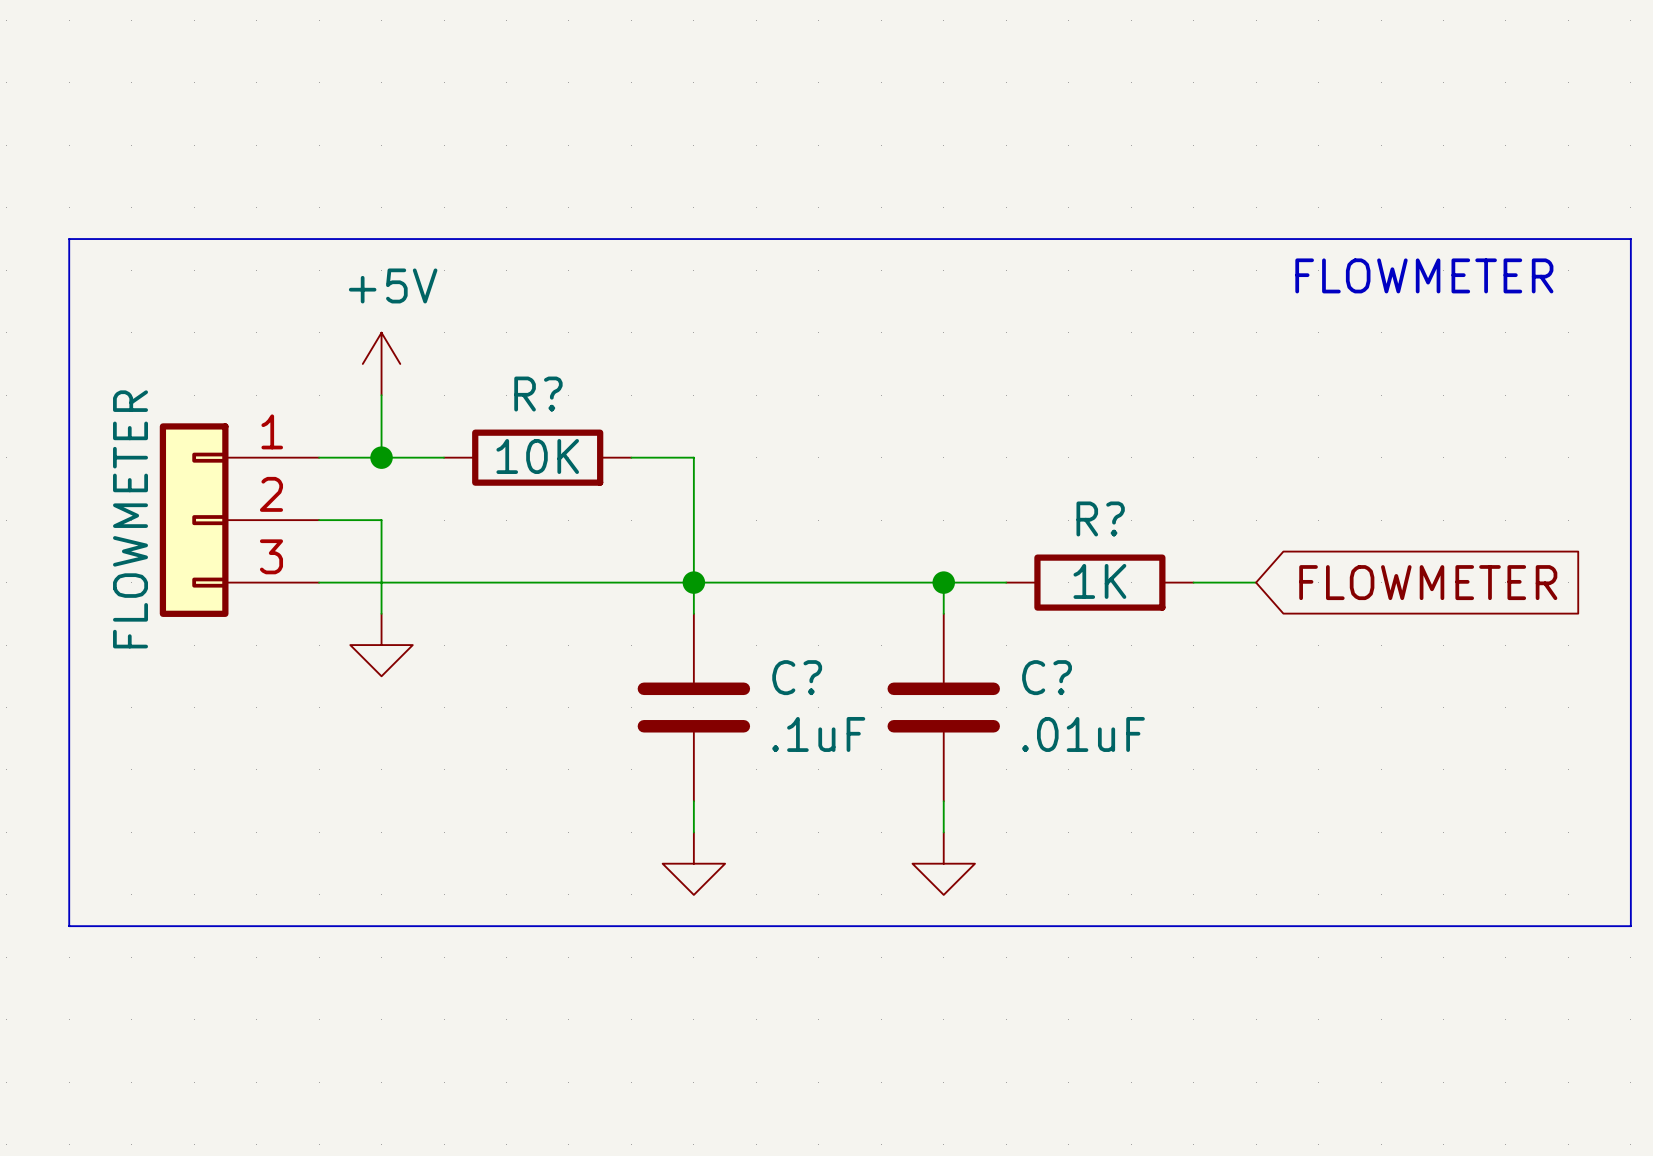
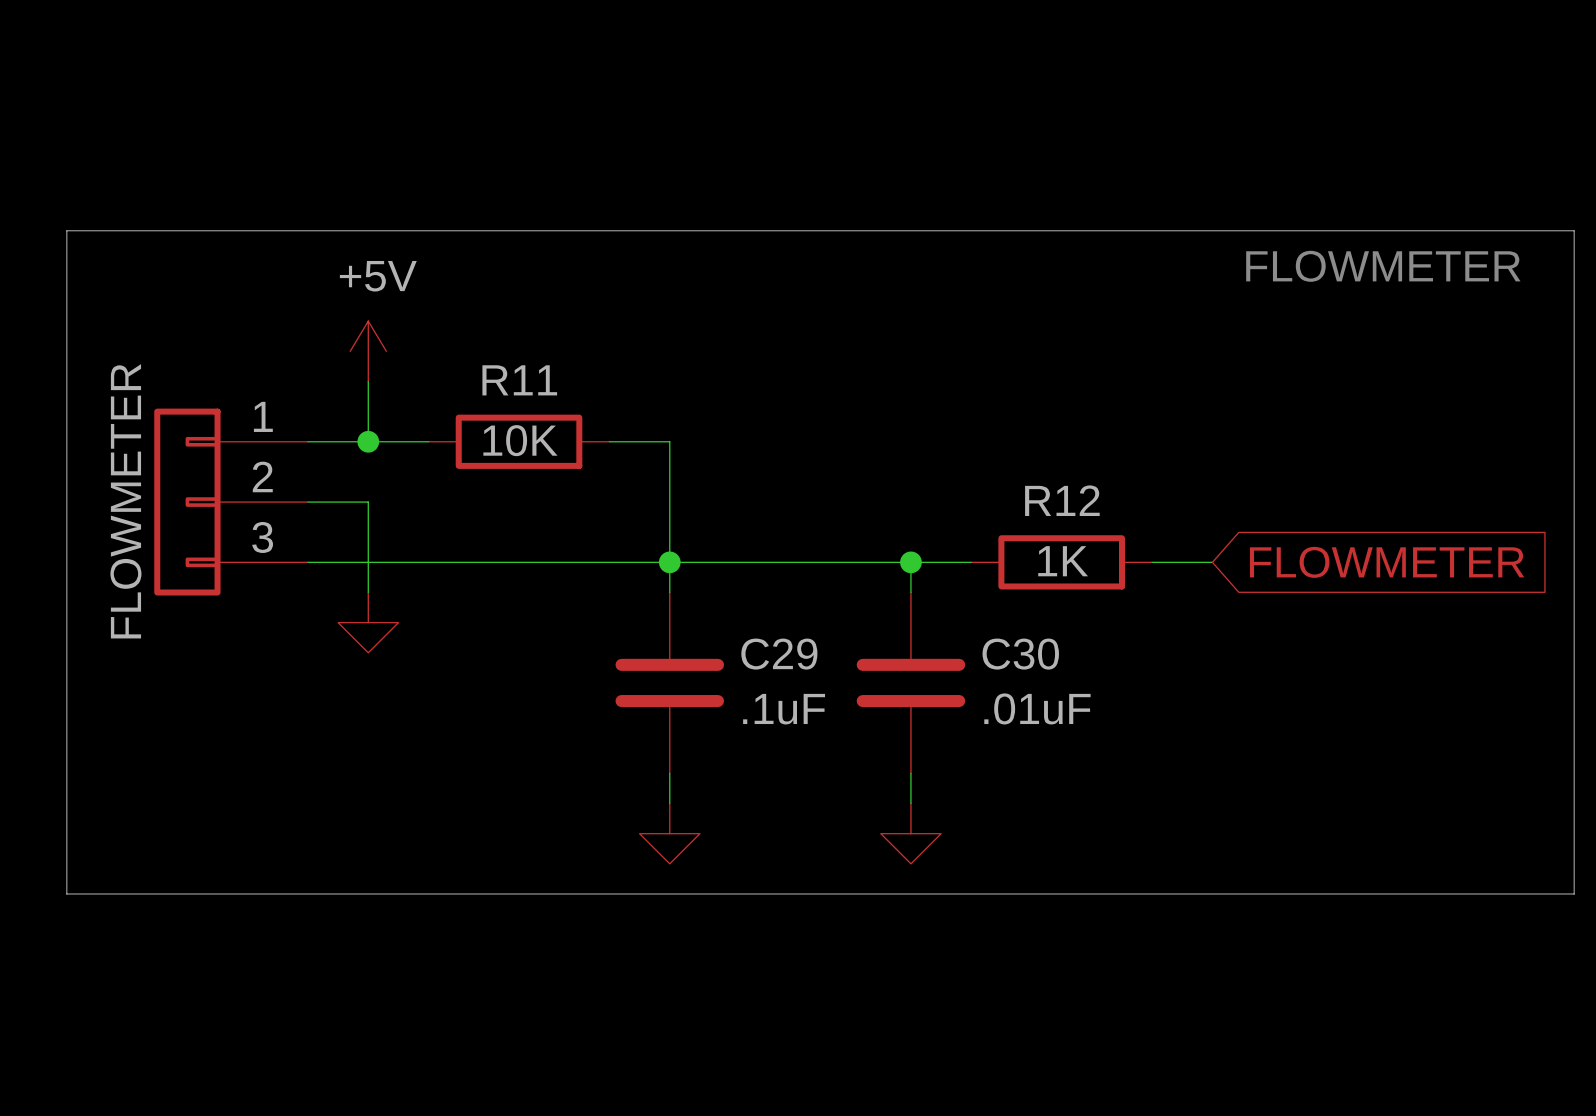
R? name: R? (538, 394) -> R11 (519, 380)
R? name: R? (1100, 518) -> R12 (1062, 500)
C? name: C? (797, 677) -> C29 (779, 654)
C? name: C? (1047, 677) -> C30 (1020, 654)

